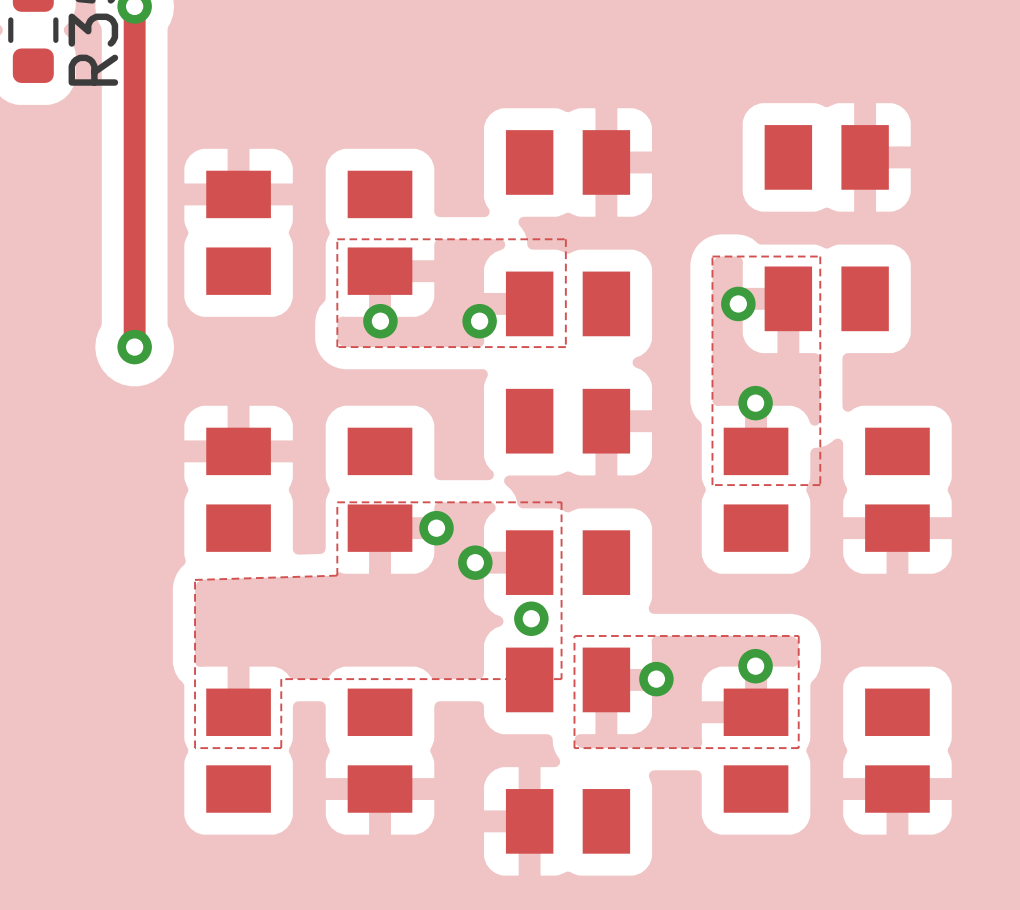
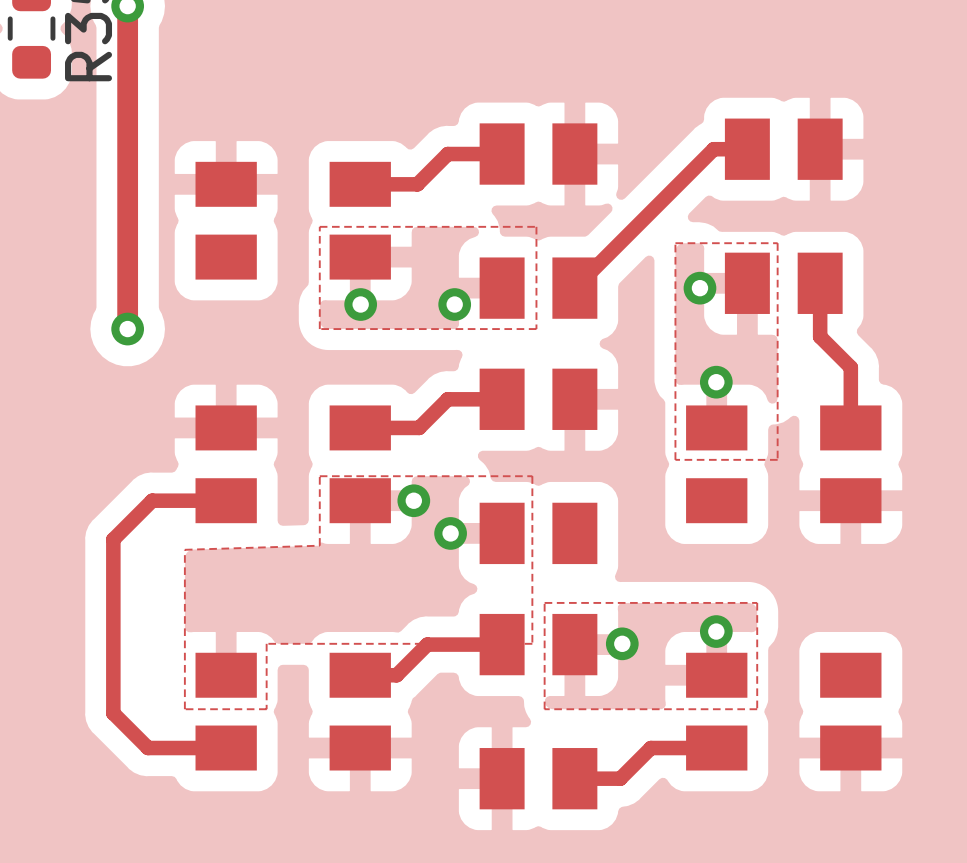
track: none -> (747, 149) (713, 149) (574, 288)
track: none -> (502, 154) (447, 154) (417, 184) (360, 184)
track: none -> (820, 283) (820, 336) (850, 367) (850, 427)
track: none -> (502, 399) (447, 399) (419, 427) (360, 427)
track: none -> (226, 500) (152, 500) (113, 539) (113, 713) (148, 748) (226, 748)
via: (531, 618) -> none
track: none -> (502, 644) (427, 644) (396, 675) (360, 675)
track: none -> (716, 748) (650, 748) (620, 778) (574, 778)

